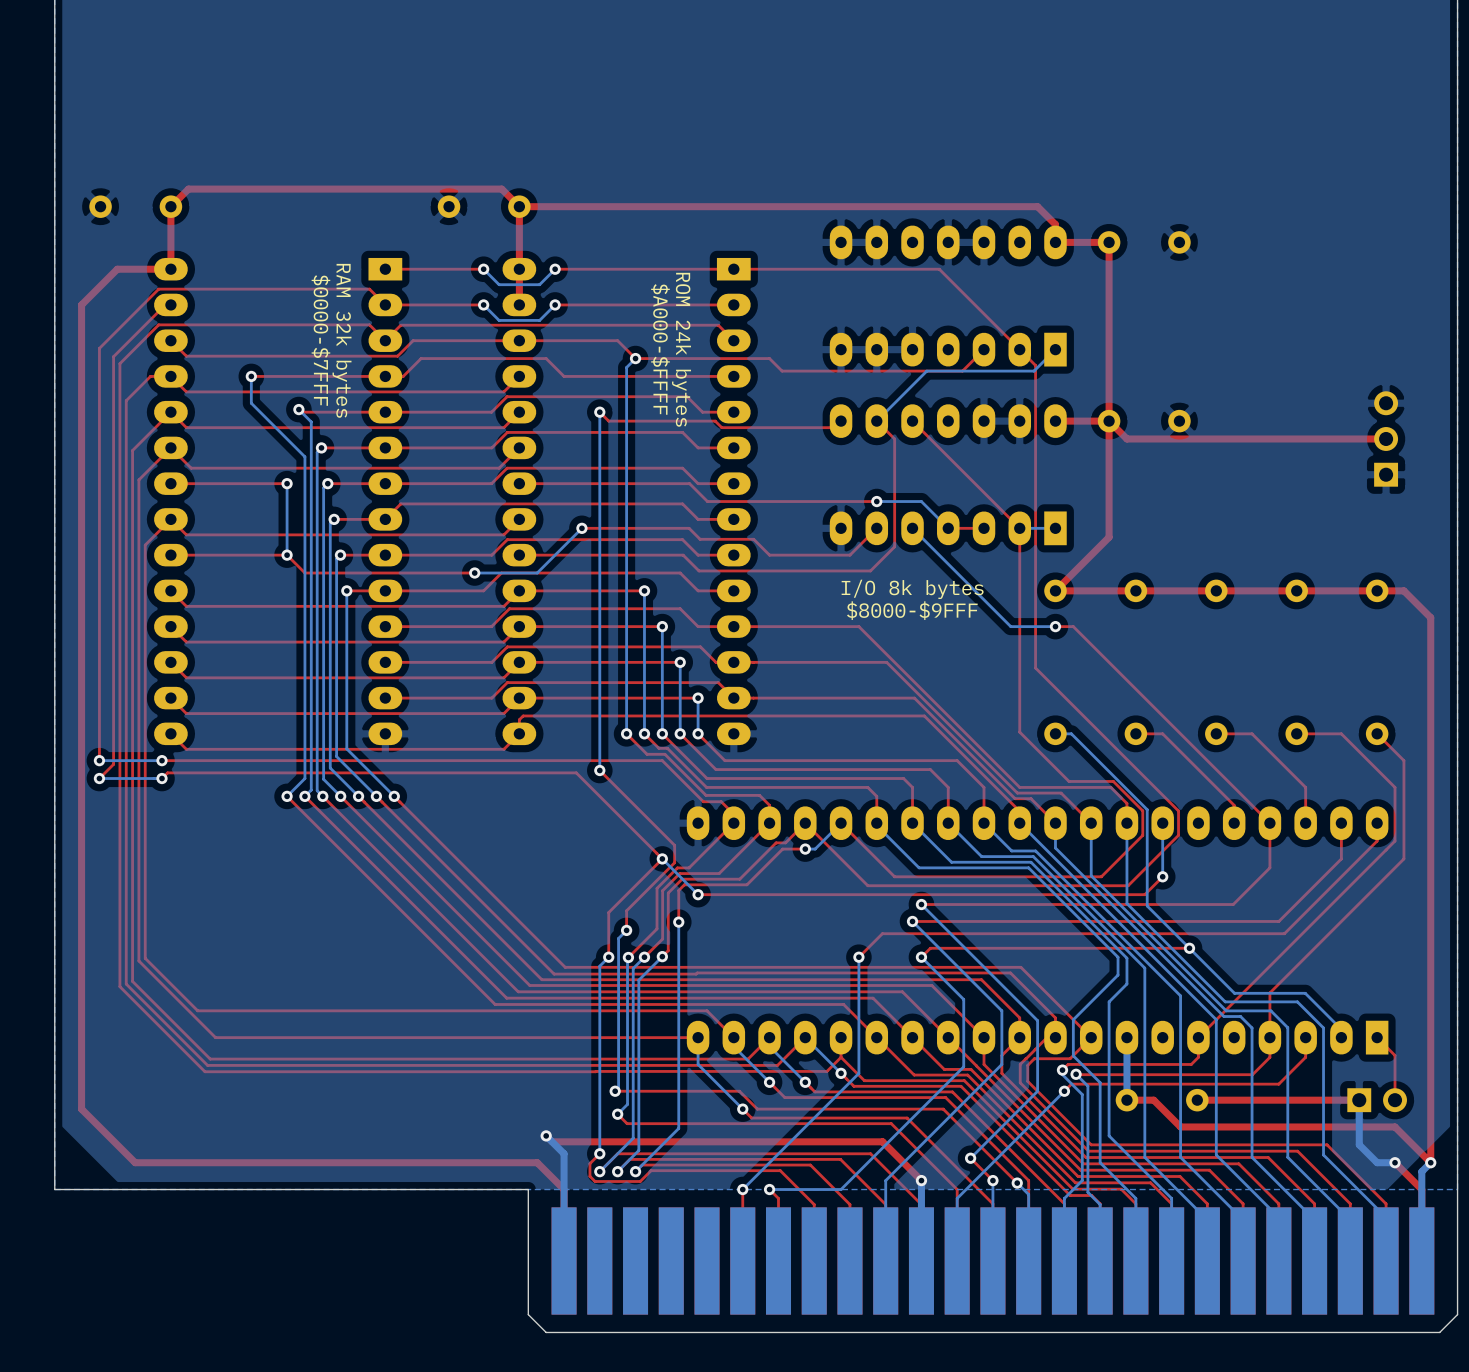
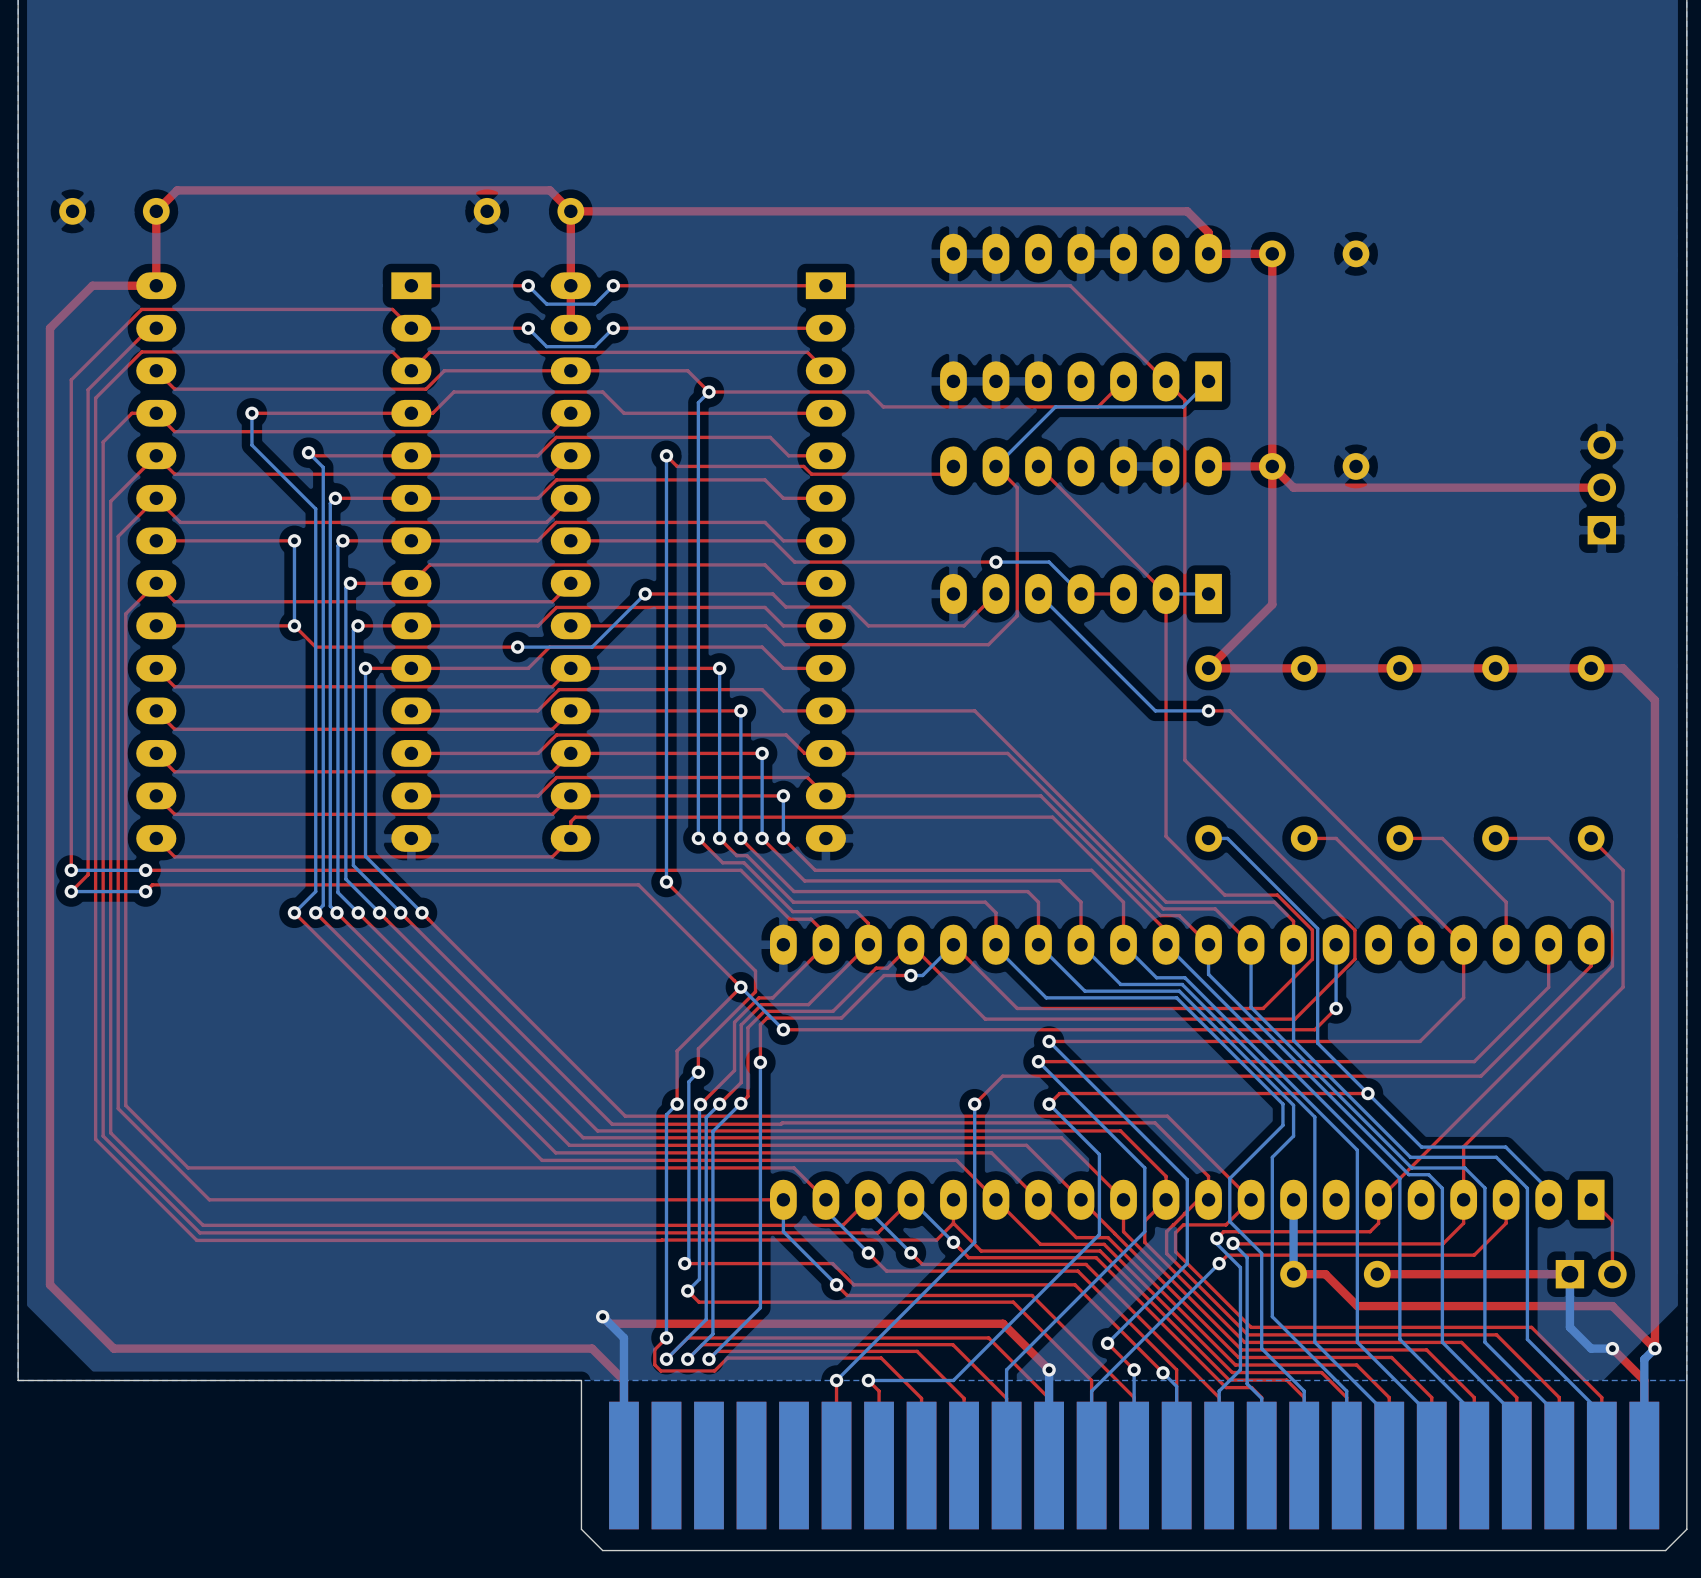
text: $0000-$7FFF (320, 340) -> none
text: RAM 32k bytes (342, 340) -> none
text: $A000-$FFFF (660, 349) -> none
text: ROM 24k bytes (681, 349) -> none
text: I/O 8k bytes (912, 589) -> none
text: $8000-$9FFF (912, 610) -> none

